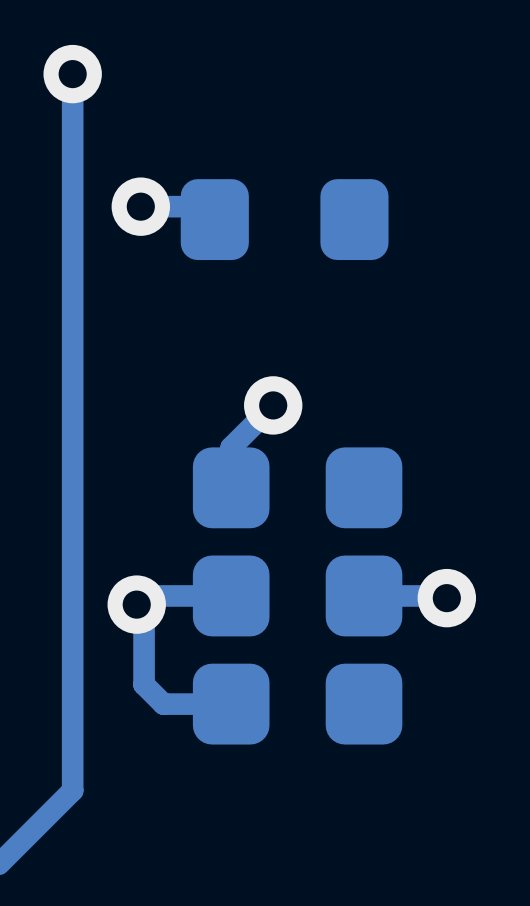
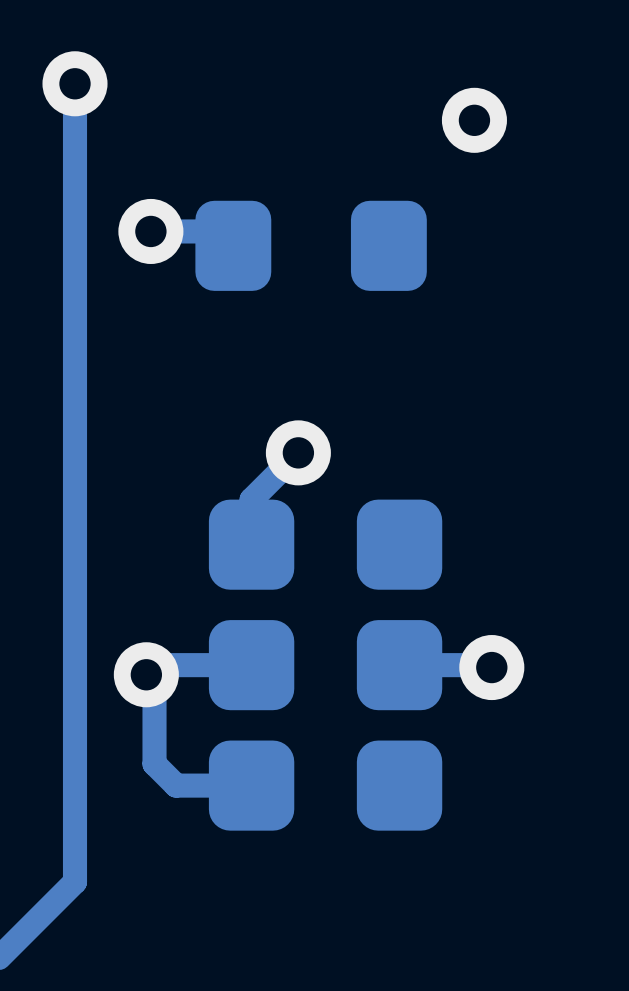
via: none -> (474, 120)

